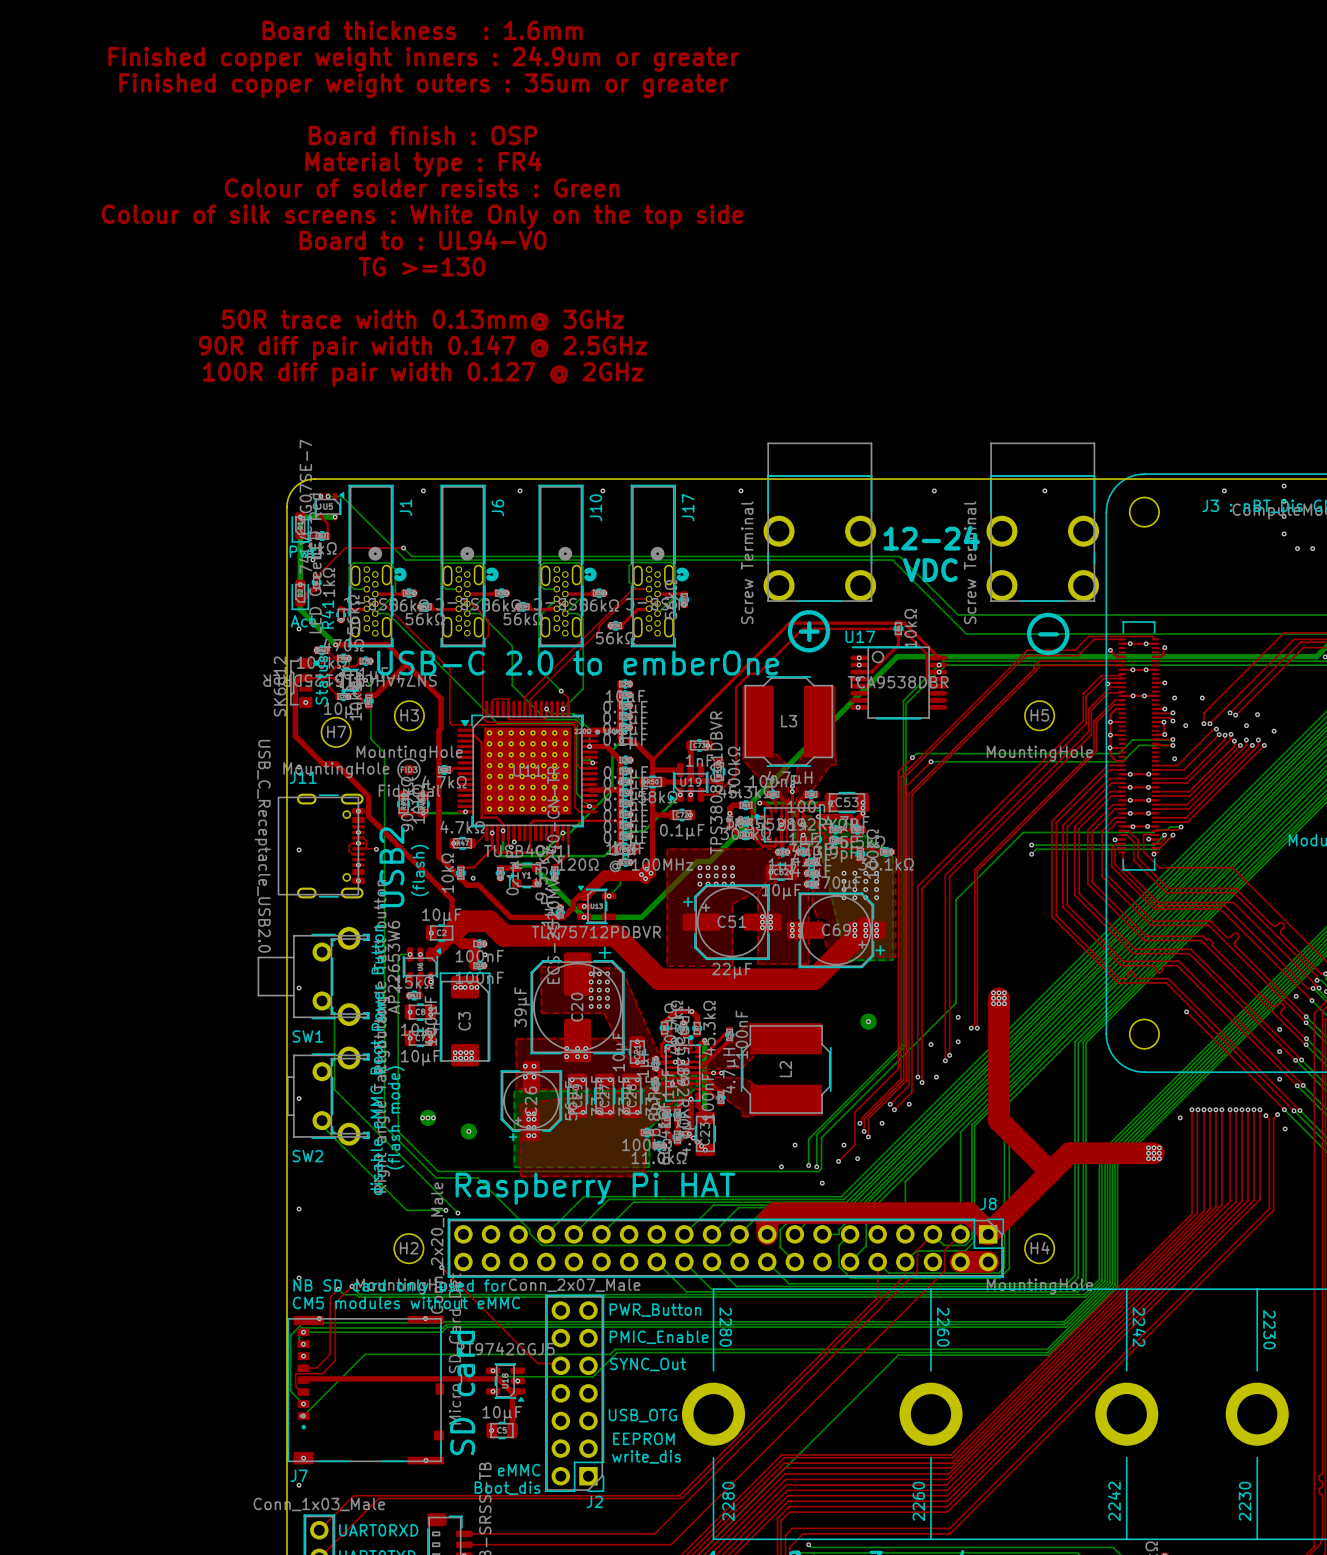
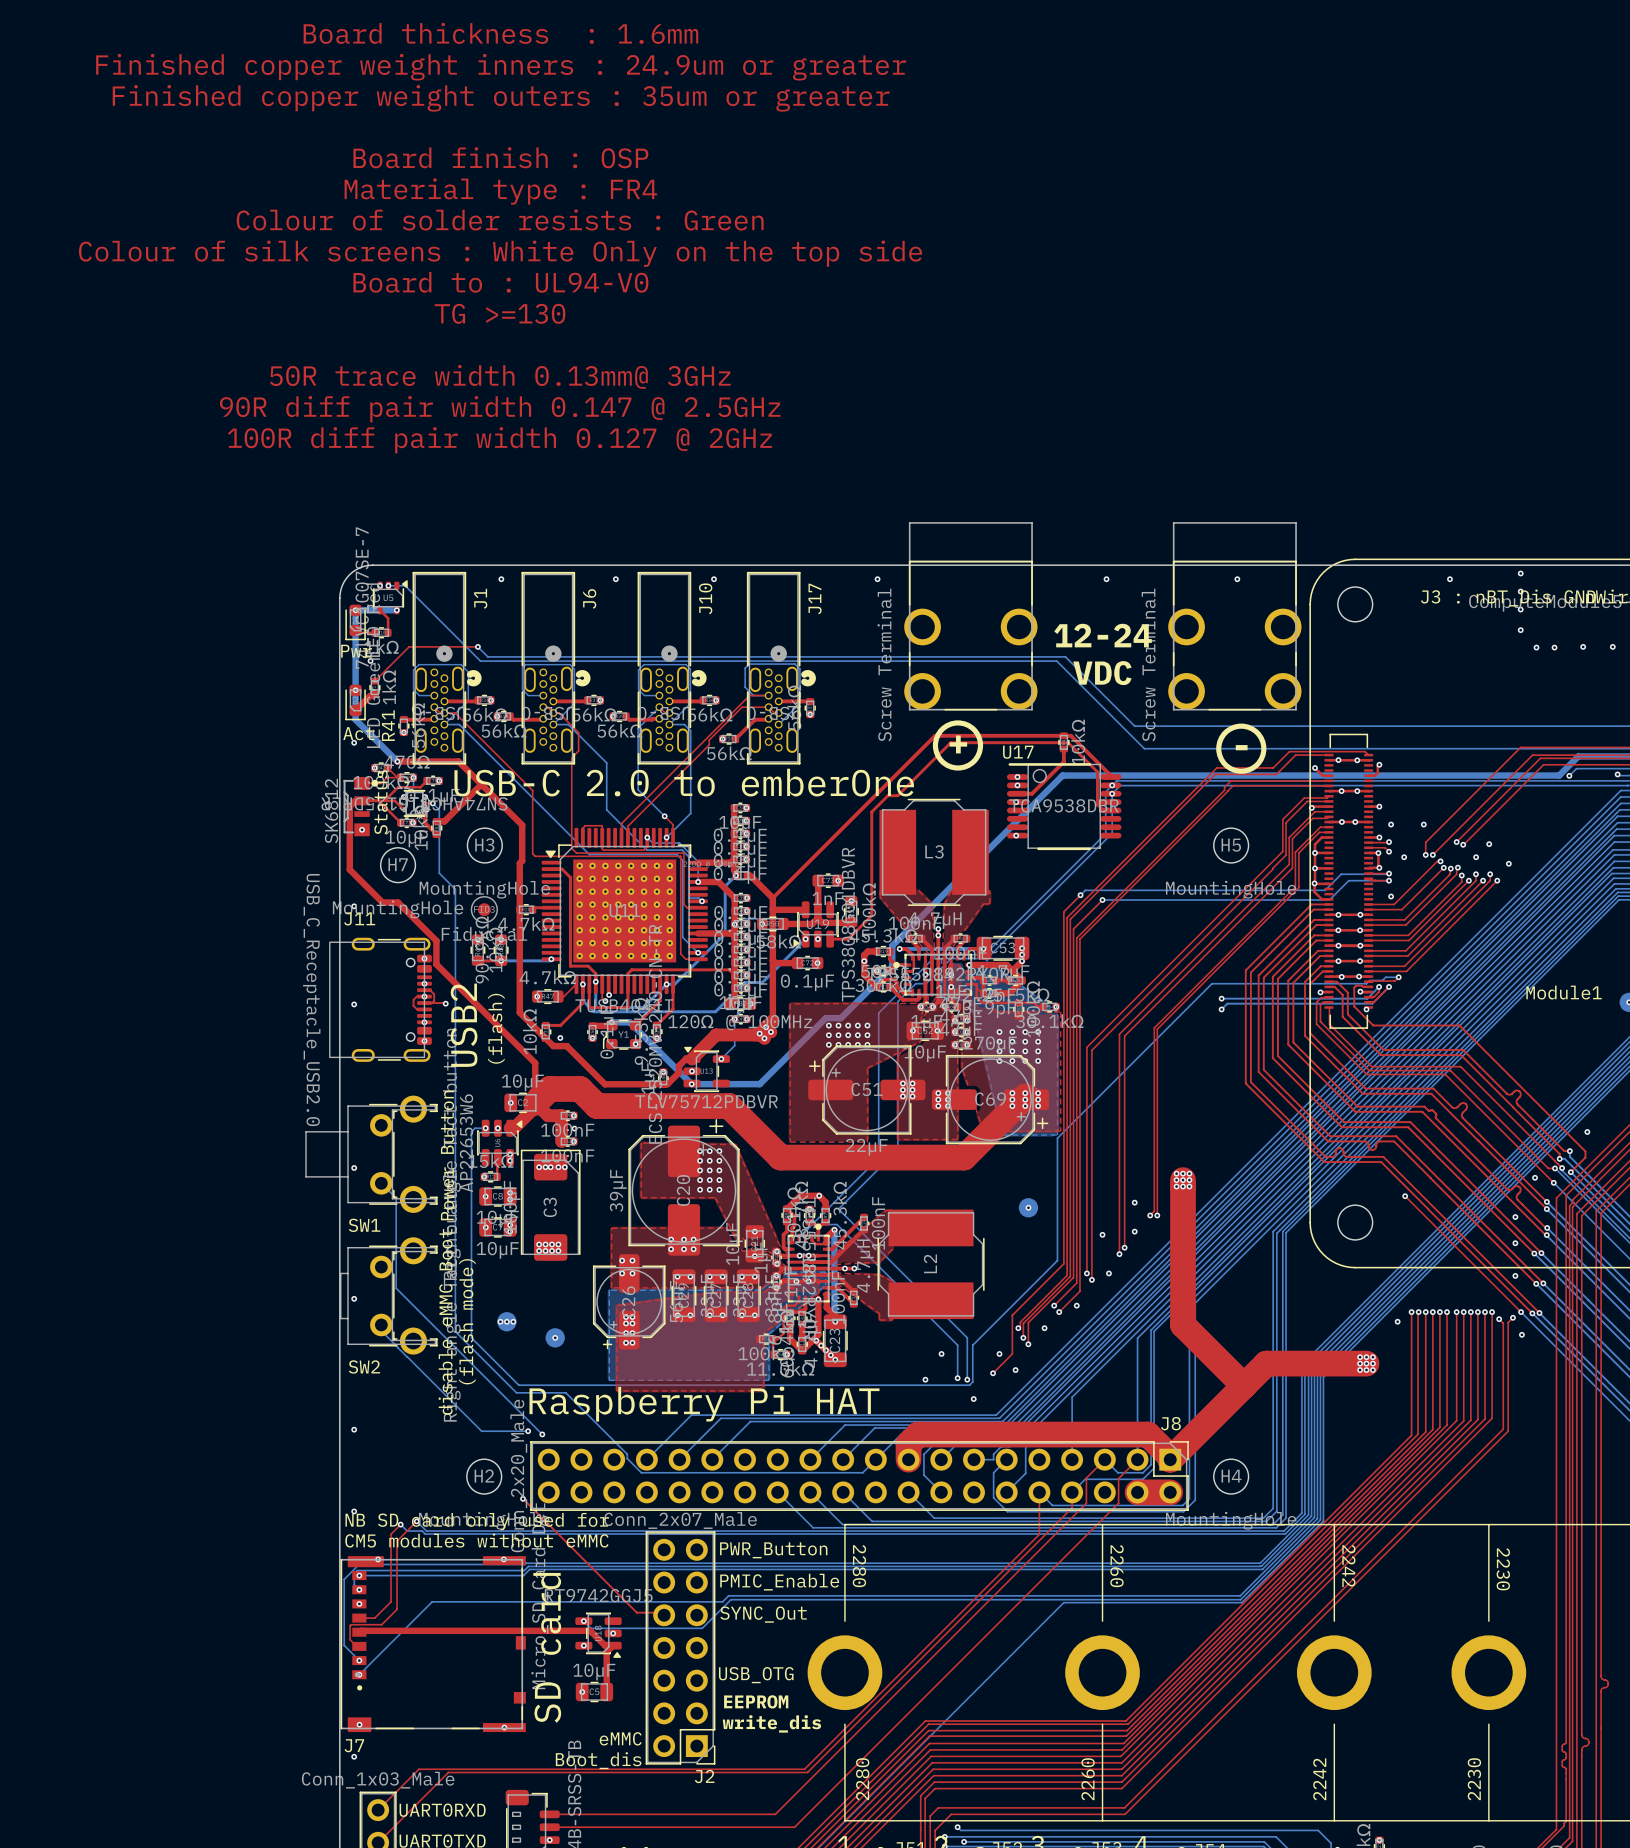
bottom track: (933, 670) (903, 700) (903, 1044) (808, 1139) -> (1105, 791) (1105, 833) (984, 954) (937, 954) (878, 1013) (878, 1157) (799, 1237)
bottom track: (938, 671) (905, 704) (905, 1045) (816, 1134) -> (1112, 793) (1112, 833) (986, 958) (951, 958) (926, 983) (915, 983) (897, 1001) (897, 1149) (838, 1209) (967, 1337) (967, 1341)
bottom track: (956, 899) (956, 1003) (892, 1066) -> (1132, 1063) (1057, 1138) (1057, 1260)
bottom track: none -> (812, 1224) (836, 1224) (957, 1347)

